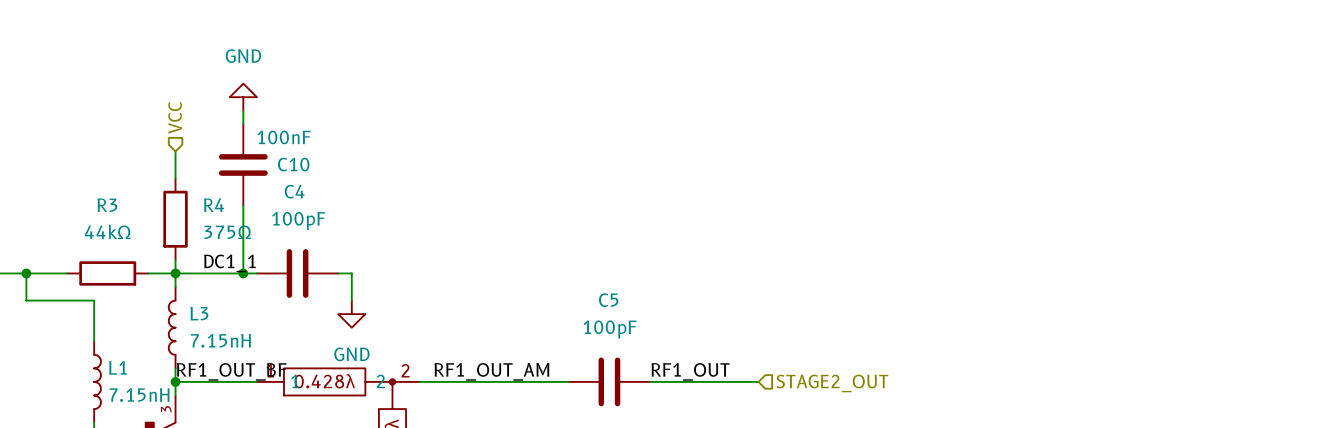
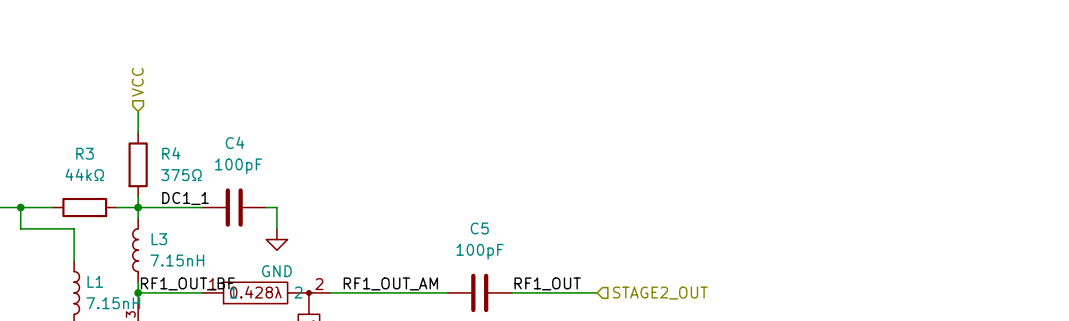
power symbol: GND (243, 97) -> none
wire: (243, 110) (243, 124) -> none
C10: 100nF (243, 164) -> none
wire: (243, 205) (243, 273) -> none
junction: (243, 273) -> none

